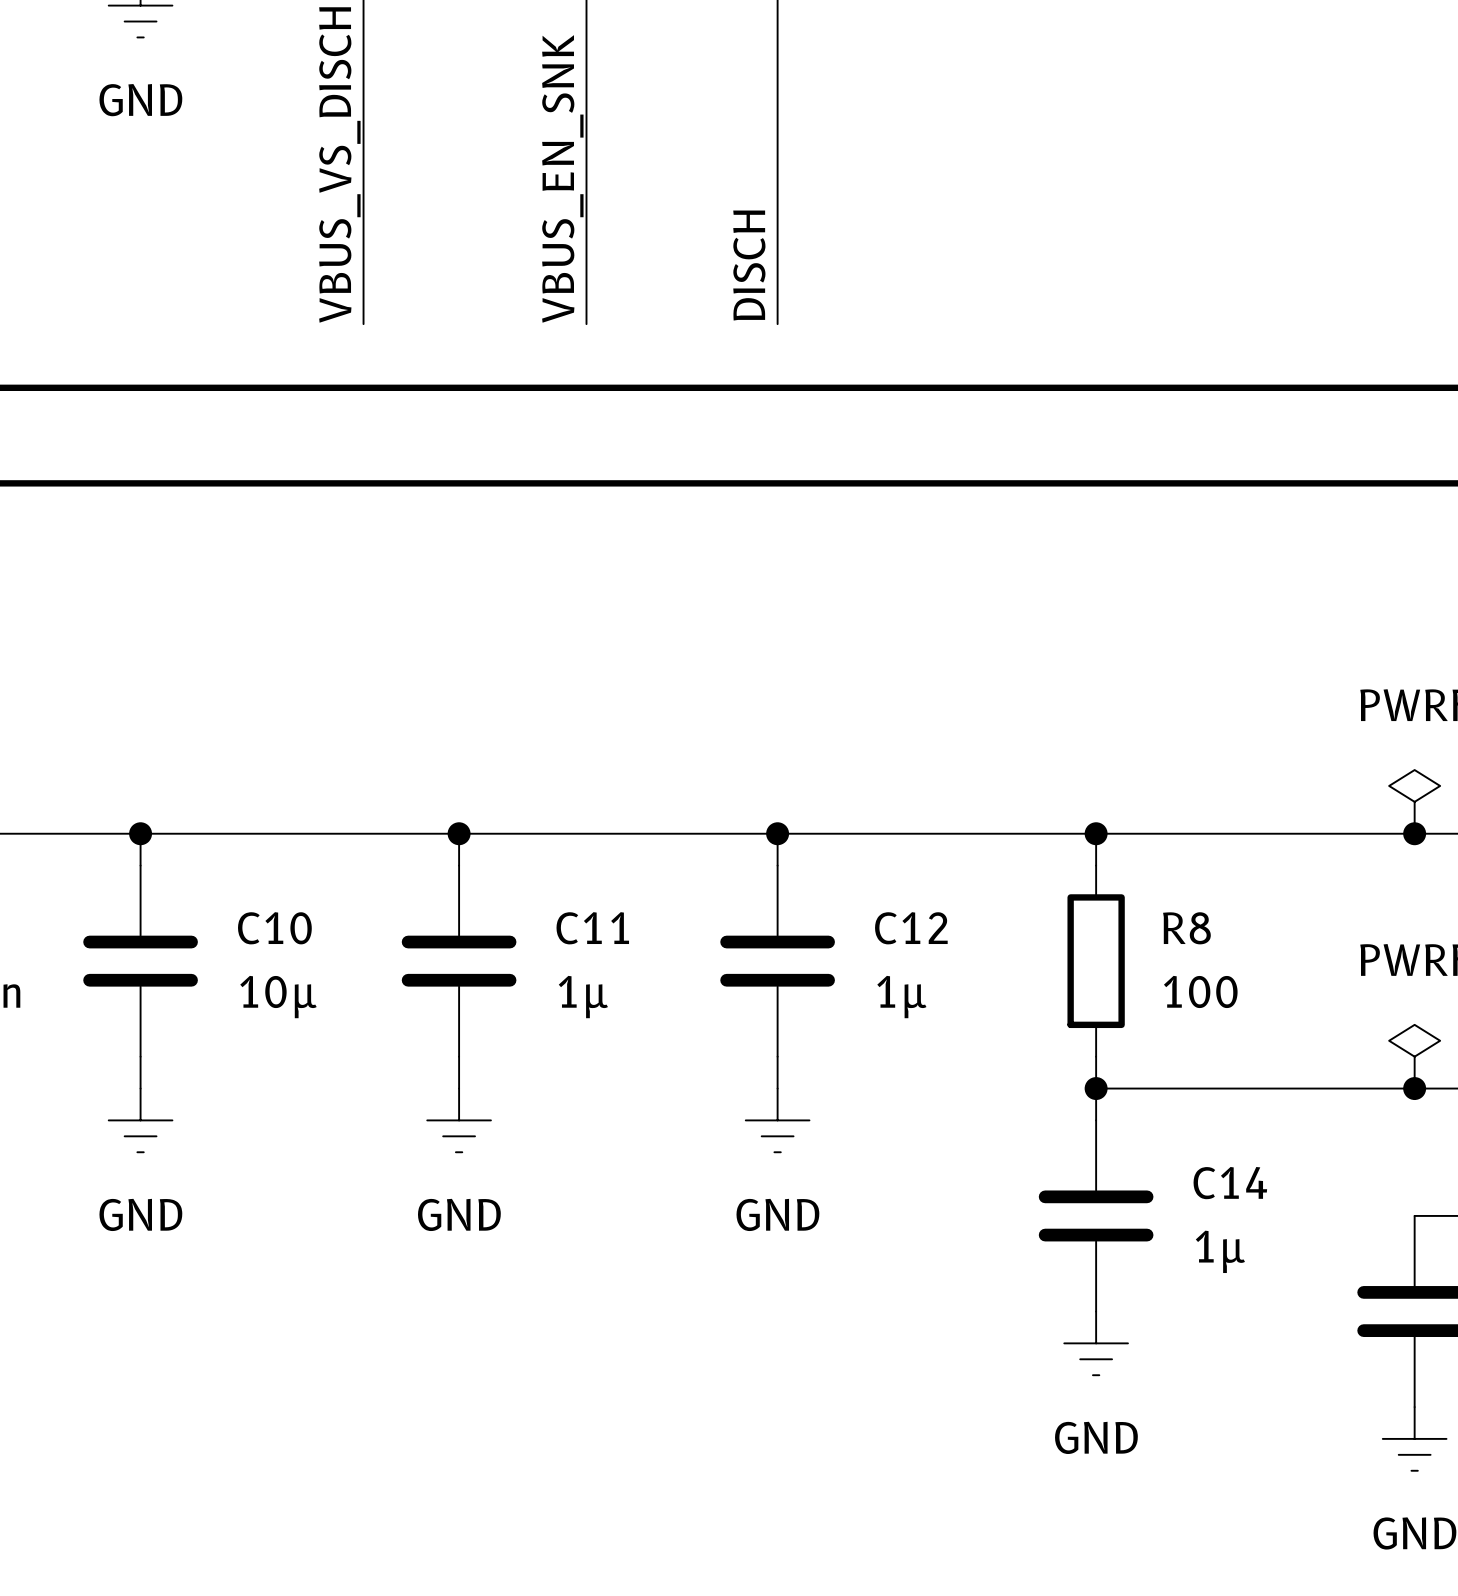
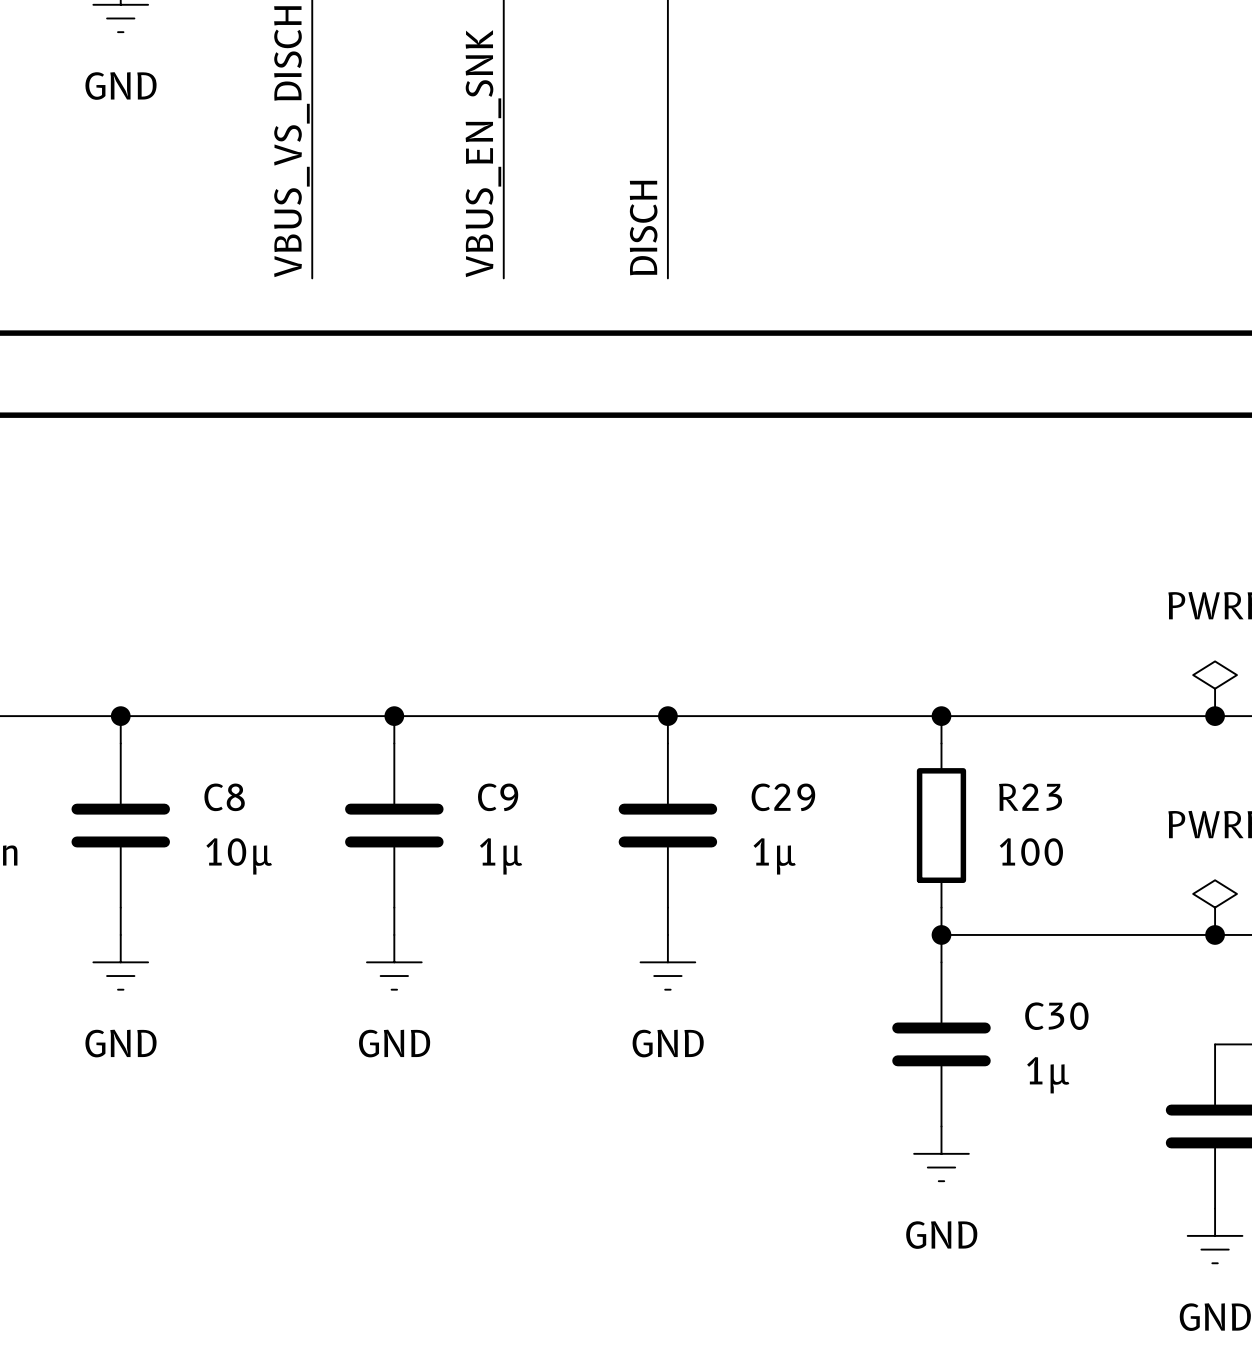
C10 name: C10 (274, 928) -> C8 (224, 797)
C11 name: C11 (592, 928) -> C9 (498, 797)
C12 name: C12 (911, 928) -> C29 (783, 797)
R8 name: R8 (1186, 928) -> R23 (1030, 797)
C14 name: C14 (1230, 1183) -> C30 (1056, 1016)

